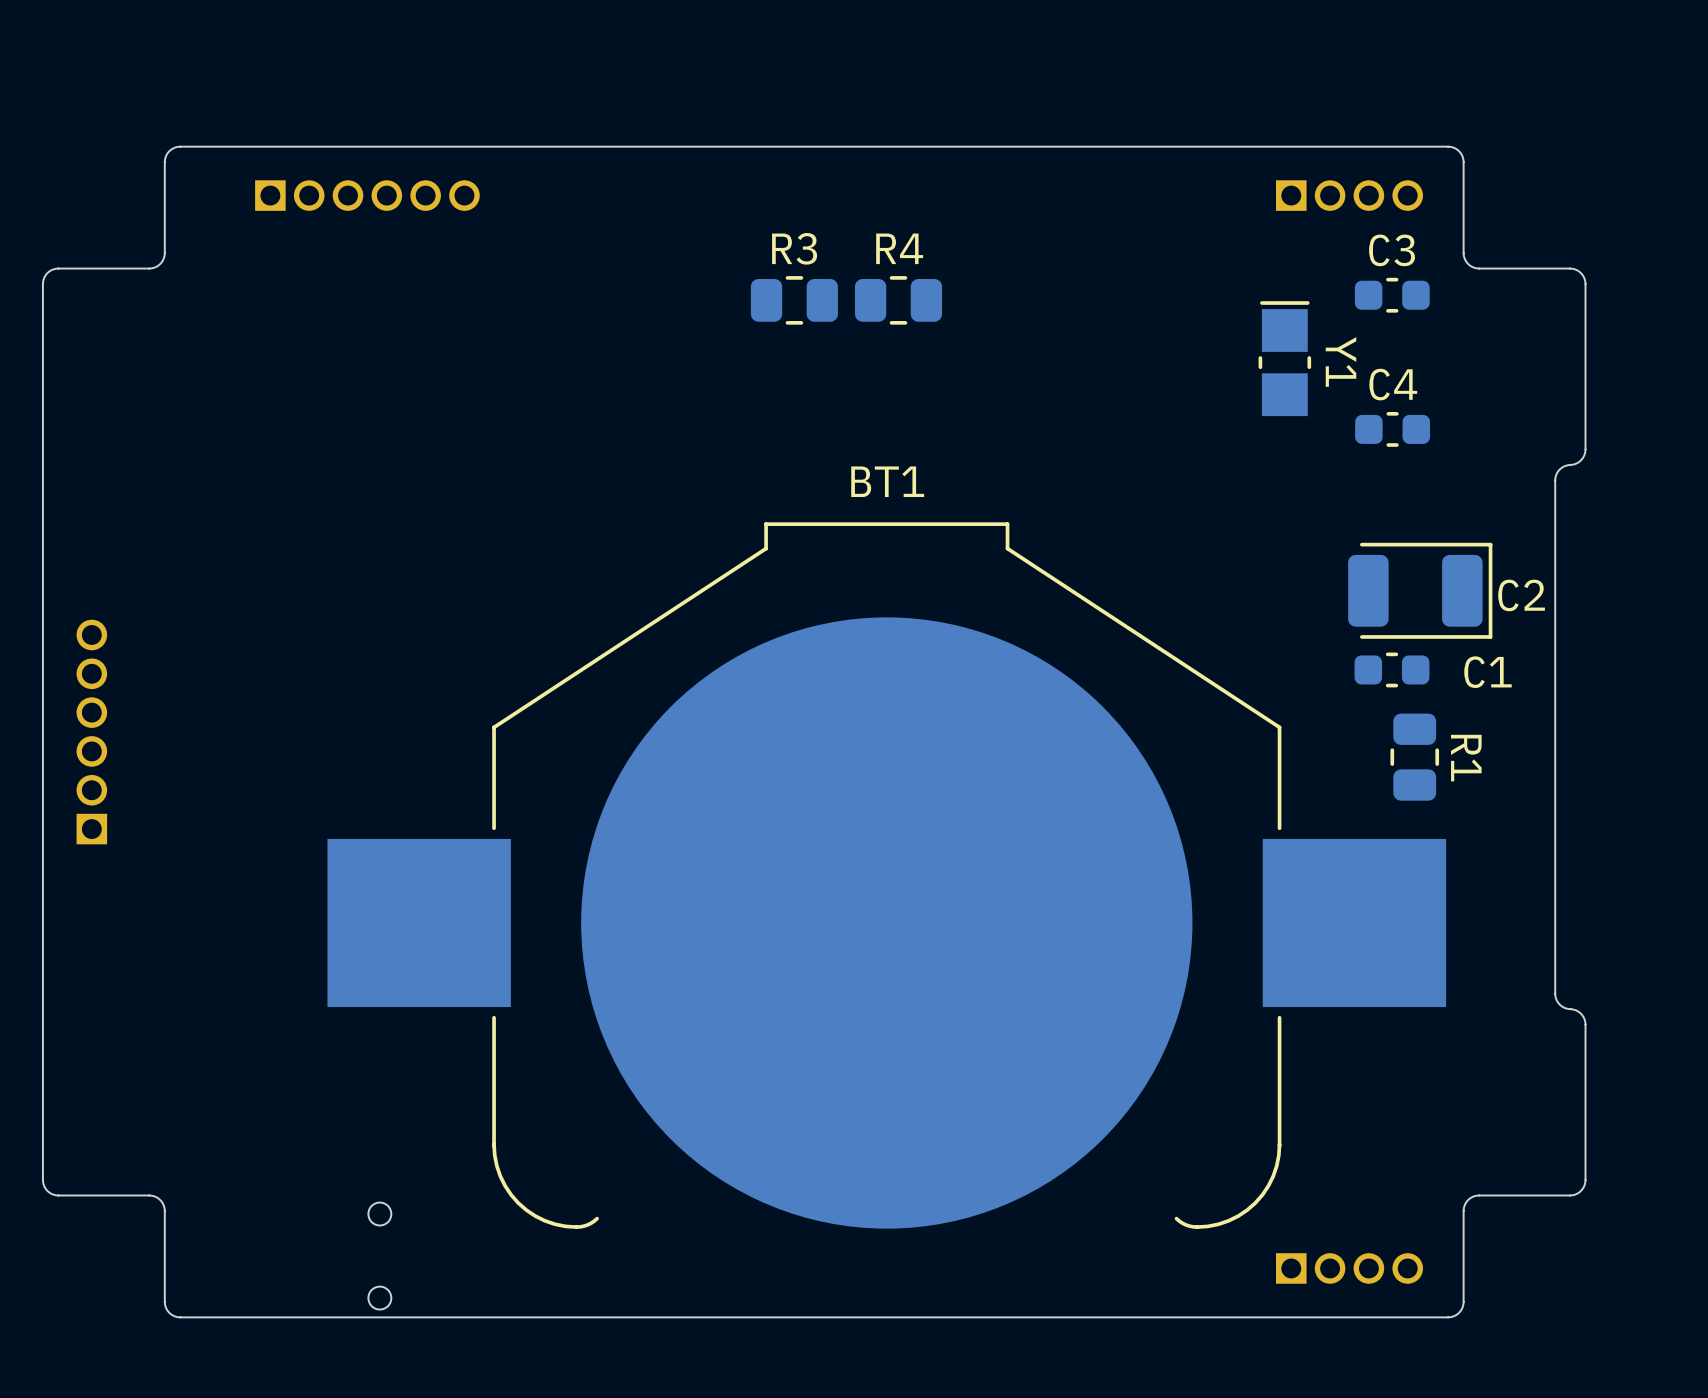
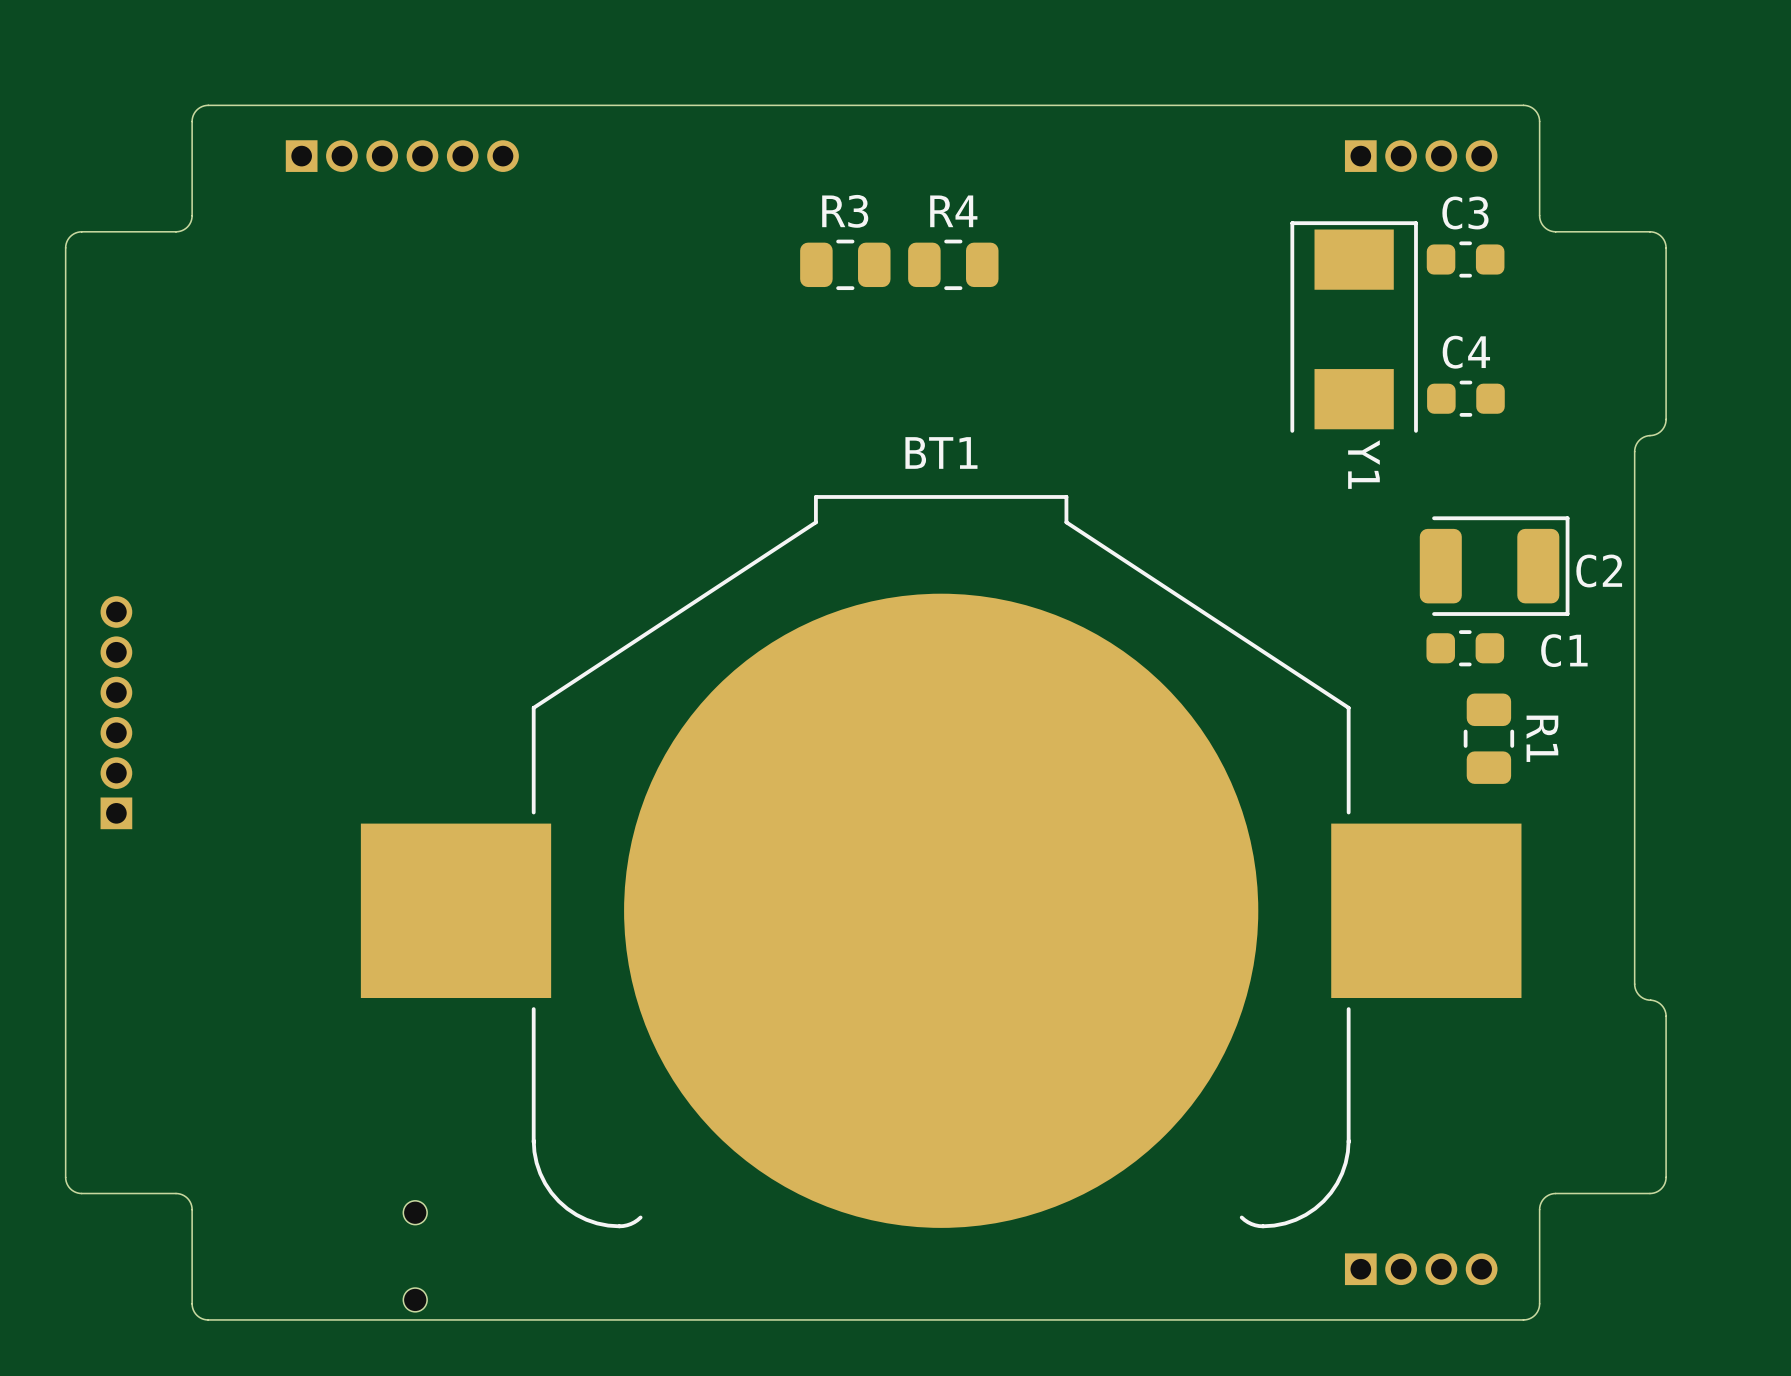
Y1 footprint: [1258, 301, 1312, 417] -> [1290, 221, 1418, 433]
Y1 name position: Y1 (1341, 361) -> Y1 (1363, 464)

